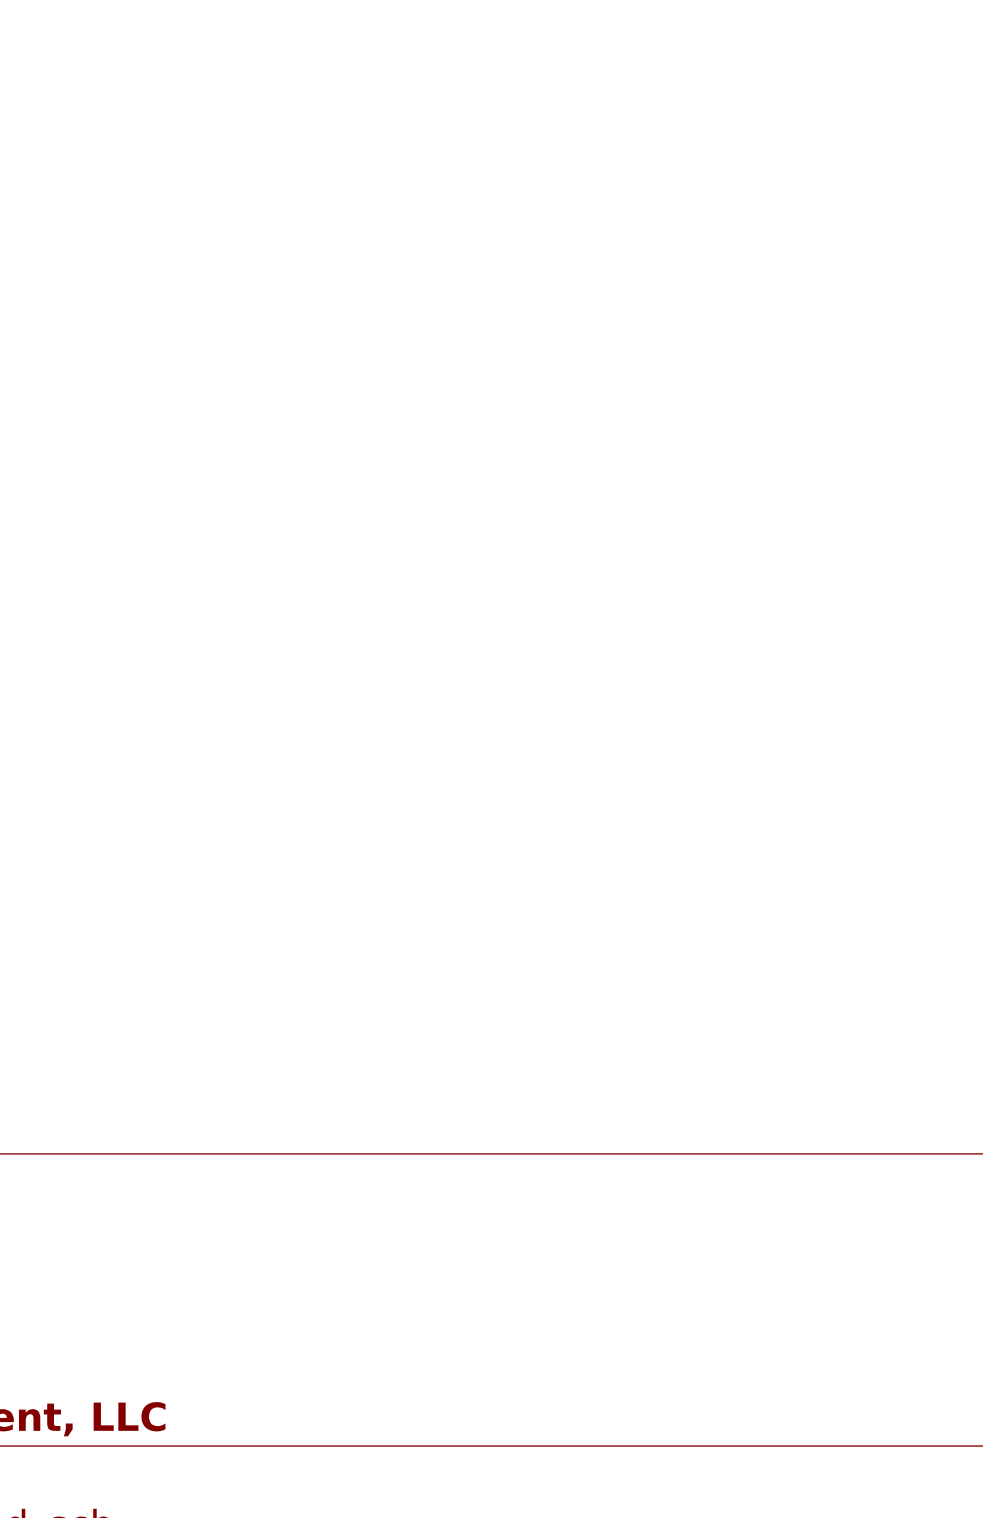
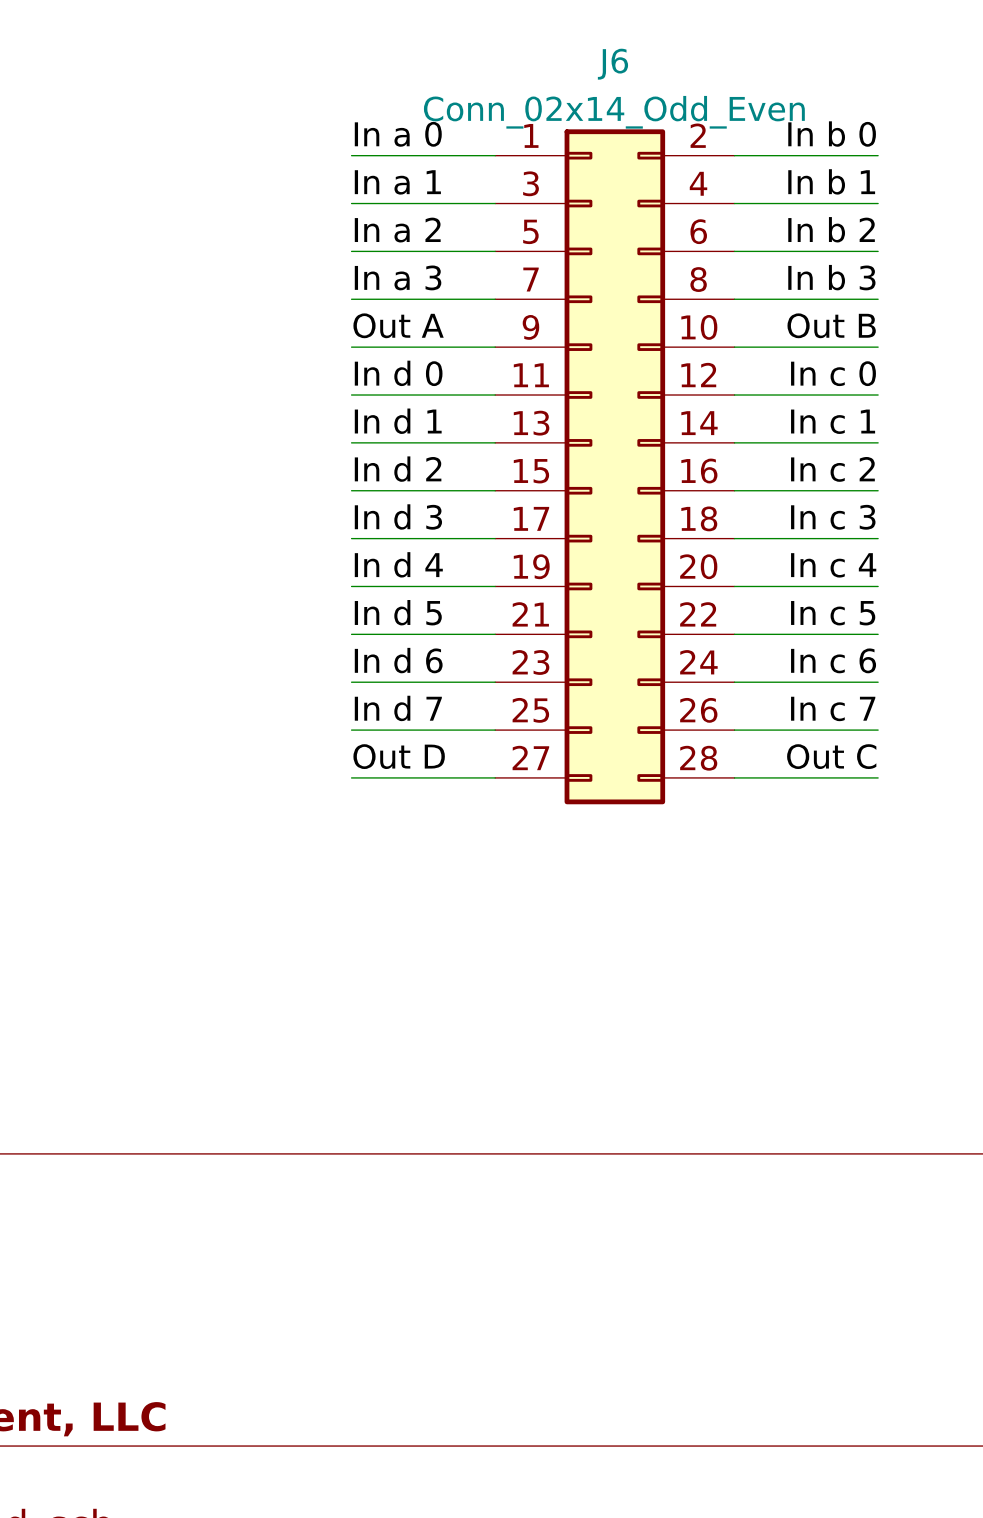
label: none -> In a 0 (398, 134)
label: none -> In b 0 (832, 134)
wire: none -> (351, 155) (495, 155)
wire: none -> (734, 155) (878, 155)
label: none -> In b 1 (831, 181)
label: none -> In a 1 (397, 182)
wire: none -> (351, 203) (495, 203)
wire: none -> (734, 203) (878, 203)
label: none -> In b 2 (831, 229)
label: none -> In a 2 (397, 230)
wire: none -> (351, 251) (495, 251)
wire: none -> (734, 251) (878, 251)
label: none -> In a 3 (398, 277)
label: none -> In b 3 (831, 277)
wire: none -> (351, 299) (495, 299)
wire: none -> (734, 299) (878, 299)
label: none -> Out A (398, 325)
label: none -> Out B (831, 325)
wire: none -> (351, 347) (495, 347)
wire: none -> (734, 347) (878, 347)
label: none -> In d 0 (398, 373)
label: none -> In c 0 (833, 373)
wire: none -> (351, 395) (495, 395)
wire: none -> (734, 395) (878, 395)
label: none -> In d 1 (398, 421)
label: none -> In c 1 (833, 421)
wire: none -> (351, 442) (495, 442)
wire: none -> (734, 442) (878, 442)
J6: none -> Conn_02x14_Odd_Even (614, 466)
label: none -> In d 2 (398, 469)
label: none -> In c 2 (832, 469)
wire: none -> (351, 490) (495, 490)
wire: none -> (734, 490) (878, 490)
label: none -> In d 3 (398, 516)
label: none -> In c 3 (833, 517)
wire: none -> (351, 538) (495, 538)
wire: none -> (734, 538) (878, 538)
label: none -> In d 4 (398, 564)
label: none -> In c 4 (833, 565)
wire: none -> (351, 586) (495, 586)
wire: none -> (734, 586) (878, 586)
label: none -> In d 5 (398, 612)
label: none -> In c 5 (833, 613)
wire: none -> (351, 634) (495, 634)
wire: none -> (734, 634) (878, 634)
label: none -> In d 6 (398, 660)
label: none -> In c 6 (833, 660)
wire: none -> (351, 682) (495, 682)
wire: none -> (734, 682) (878, 682)
label: none -> In d 7 (398, 708)
label: none -> In c 7 (833, 708)
wire: none -> (351, 730) (495, 730)
wire: none -> (734, 730) (878, 730)
label: none -> Out D (399, 756)
label: none -> Out C (831, 756)
wire: none -> (351, 777) (495, 777)
wire: none -> (734, 777) (878, 777)

